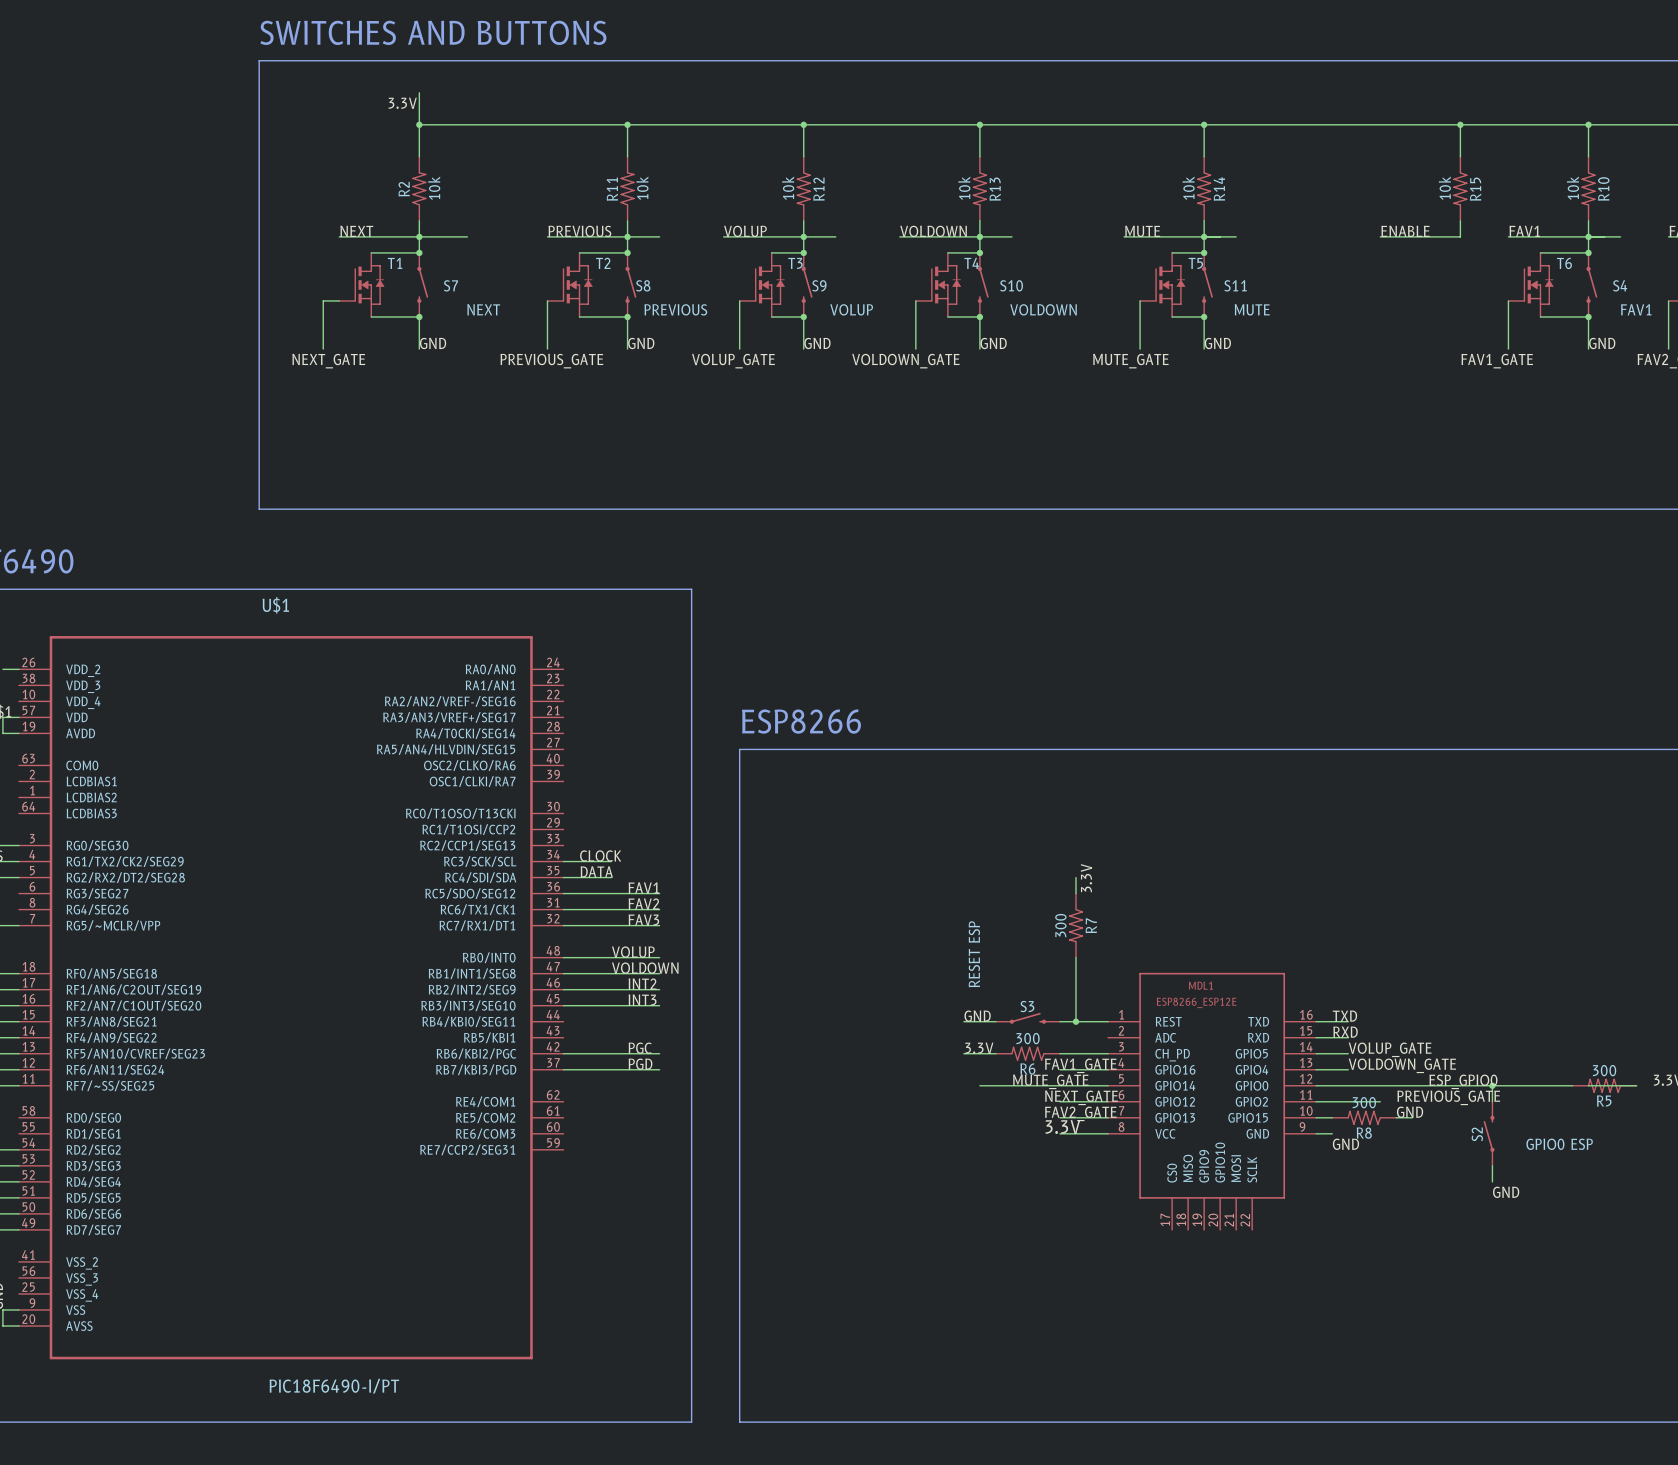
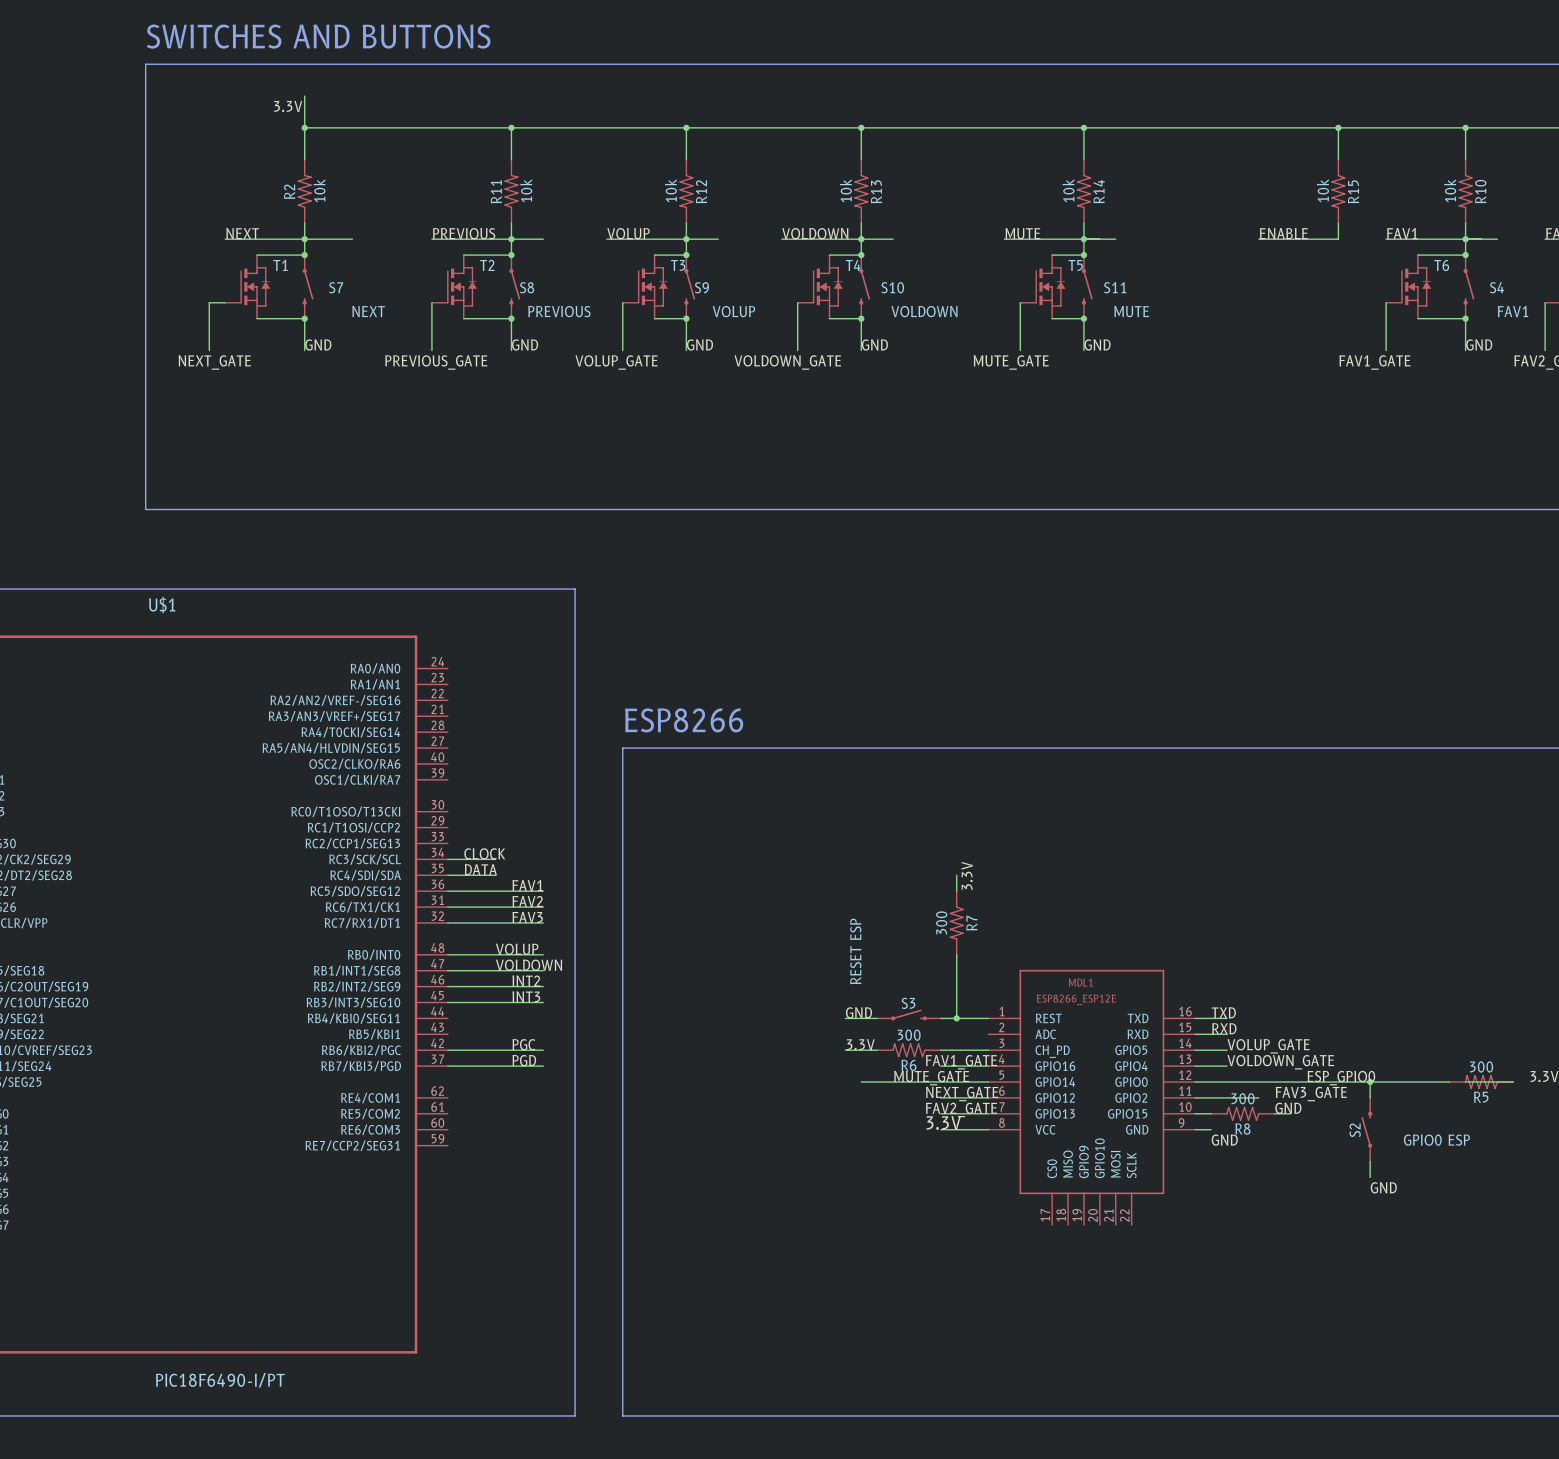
label: PREVIOUS_GATE (1448, 1097) -> FAV3_GATE (1311, 1094)

